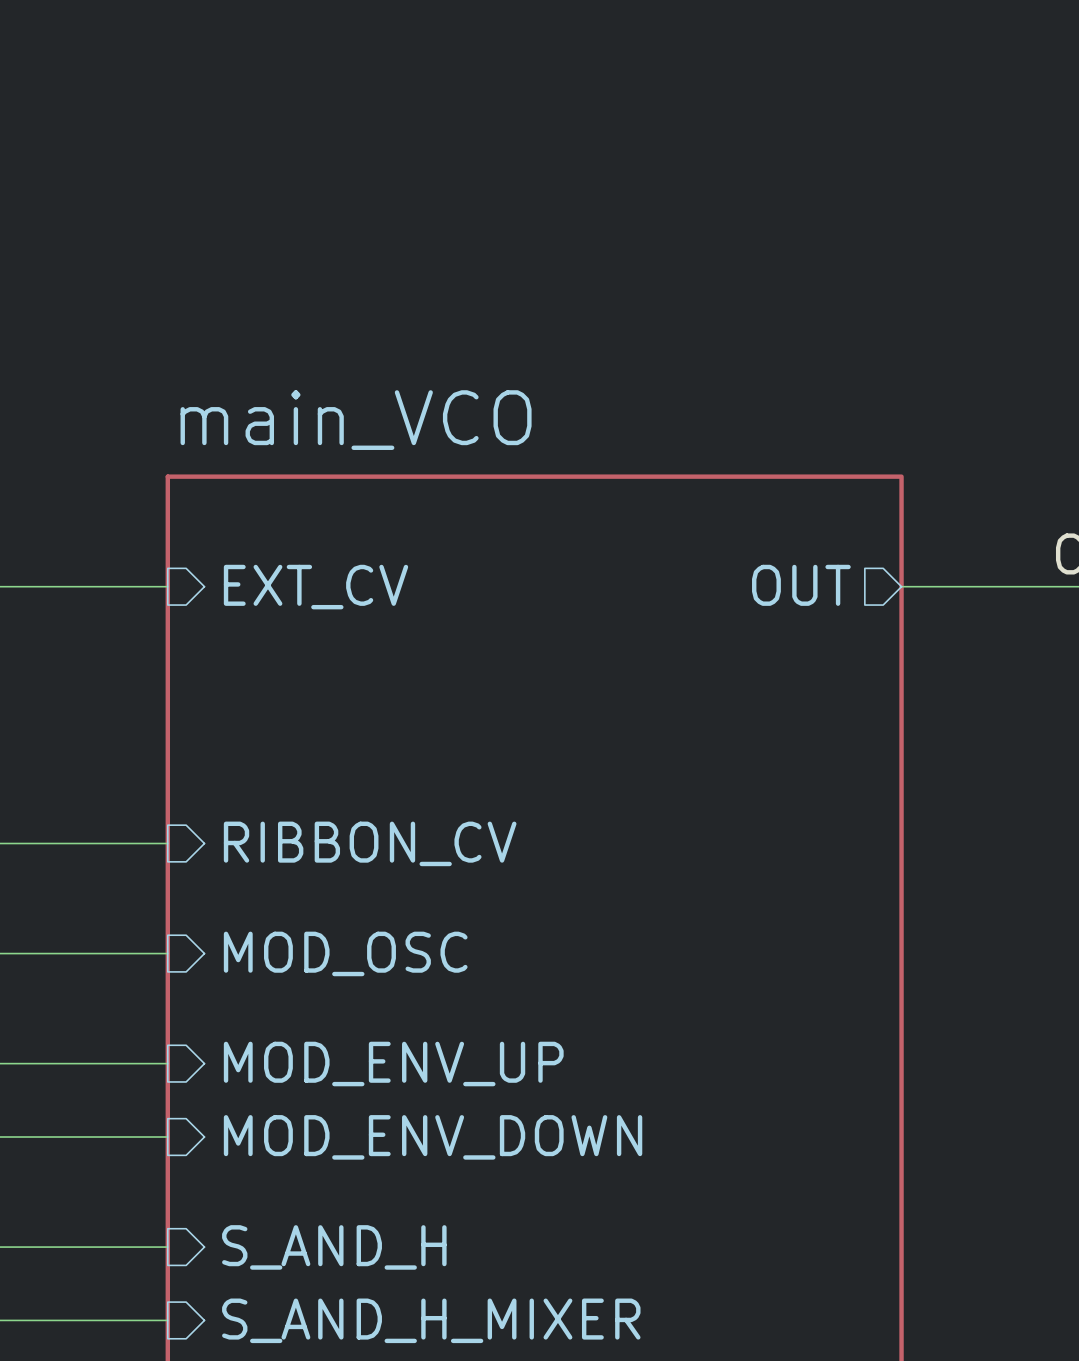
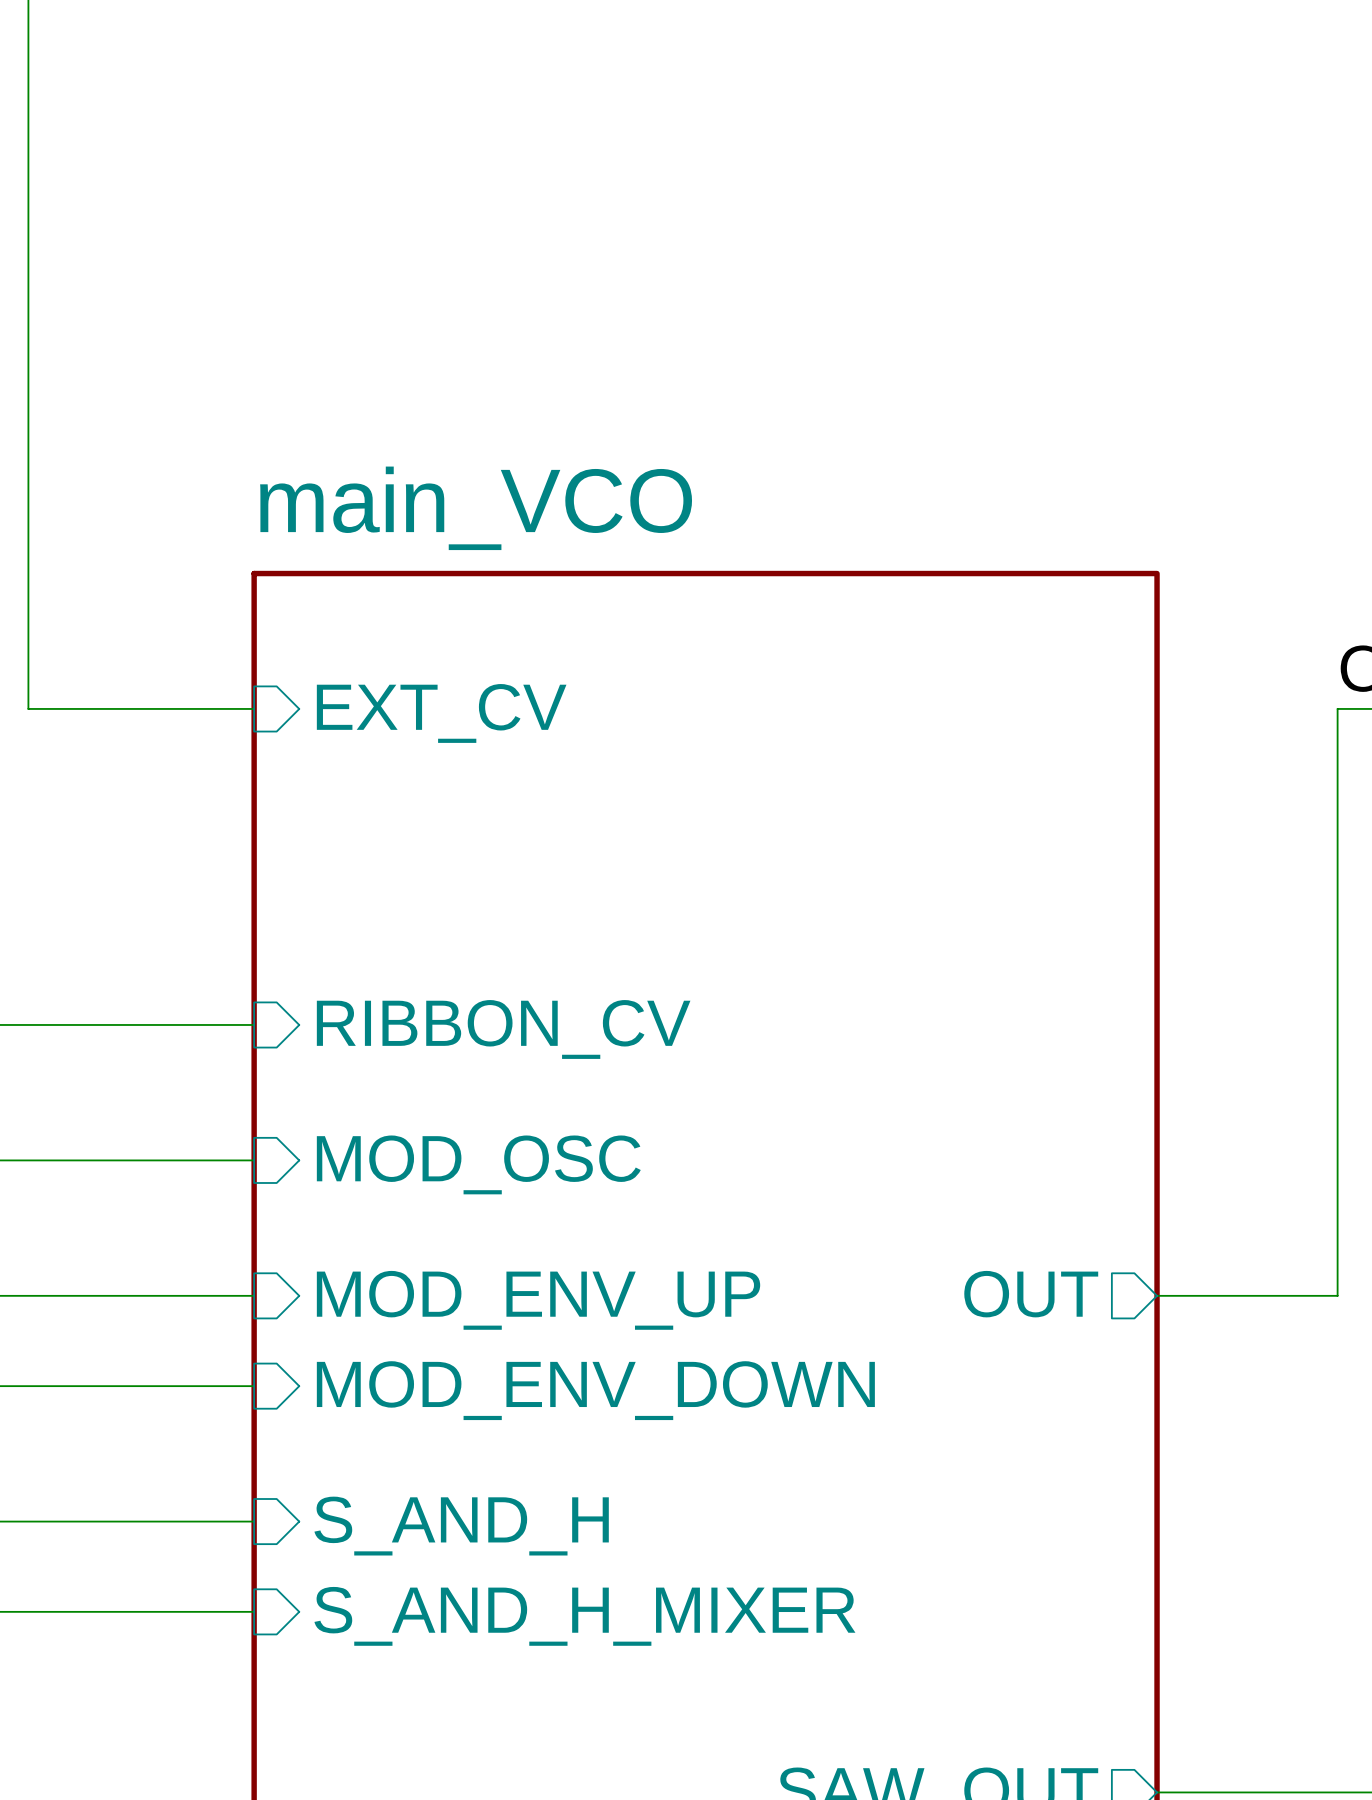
sheet pin position: OUT (801, 585) -> OUT (1031, 1294)
wire: (901, 586) (1048, 586) -> (1157, 1295) (1337, 1295) (1337, 708)

